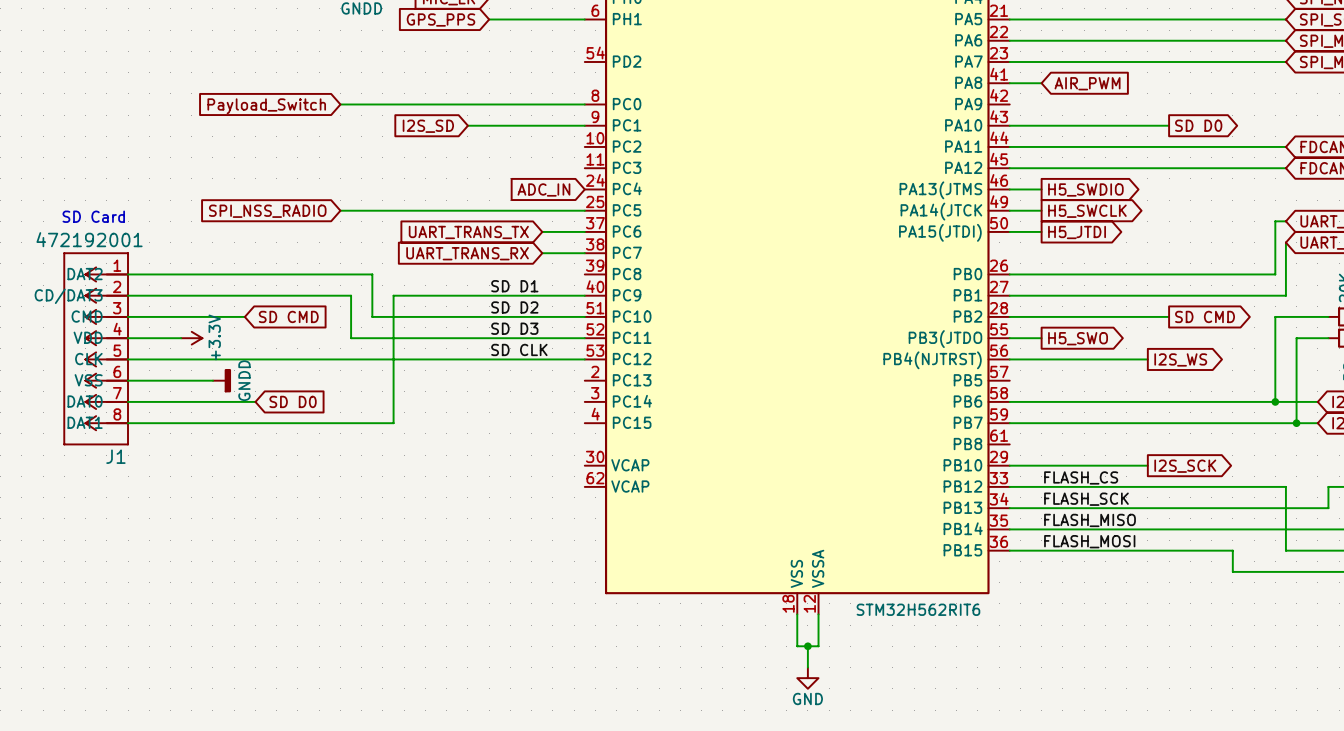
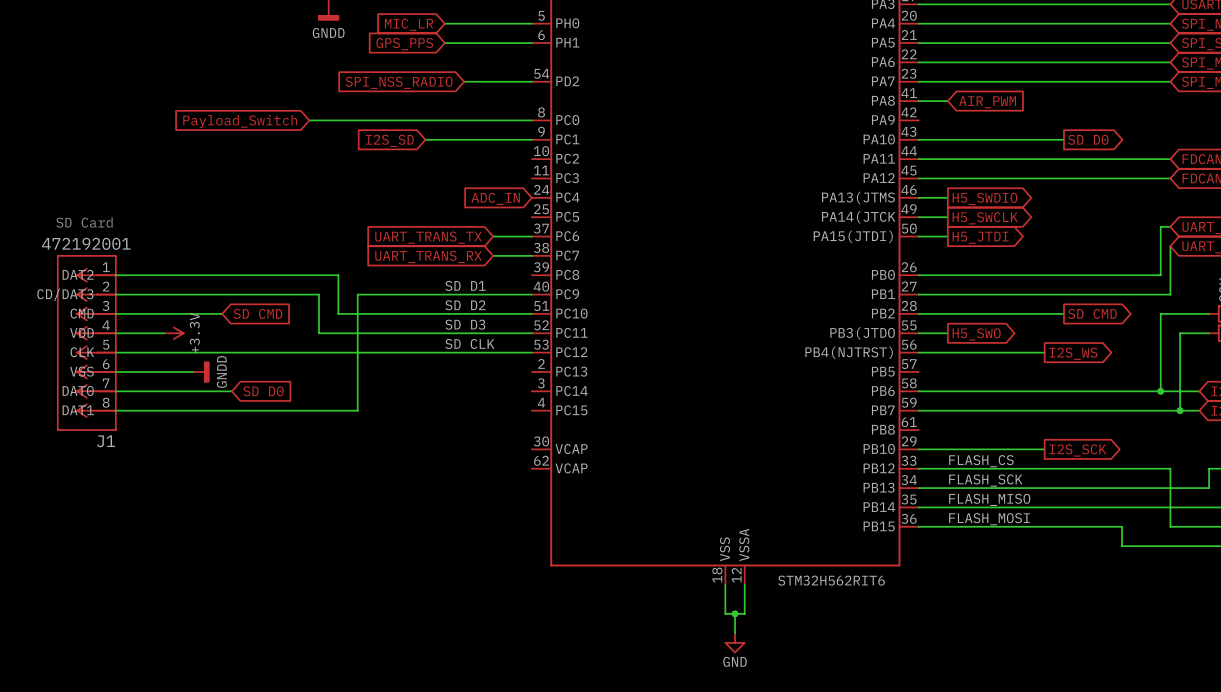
wire: none -> (464, 81) (531, 81)
global label: none -> SPI_NSS_RADIO (399, 82)
wire: (340, 210) (584, 210) -> none
global label: SPI_NSS_RADIO (267, 211) -> none

